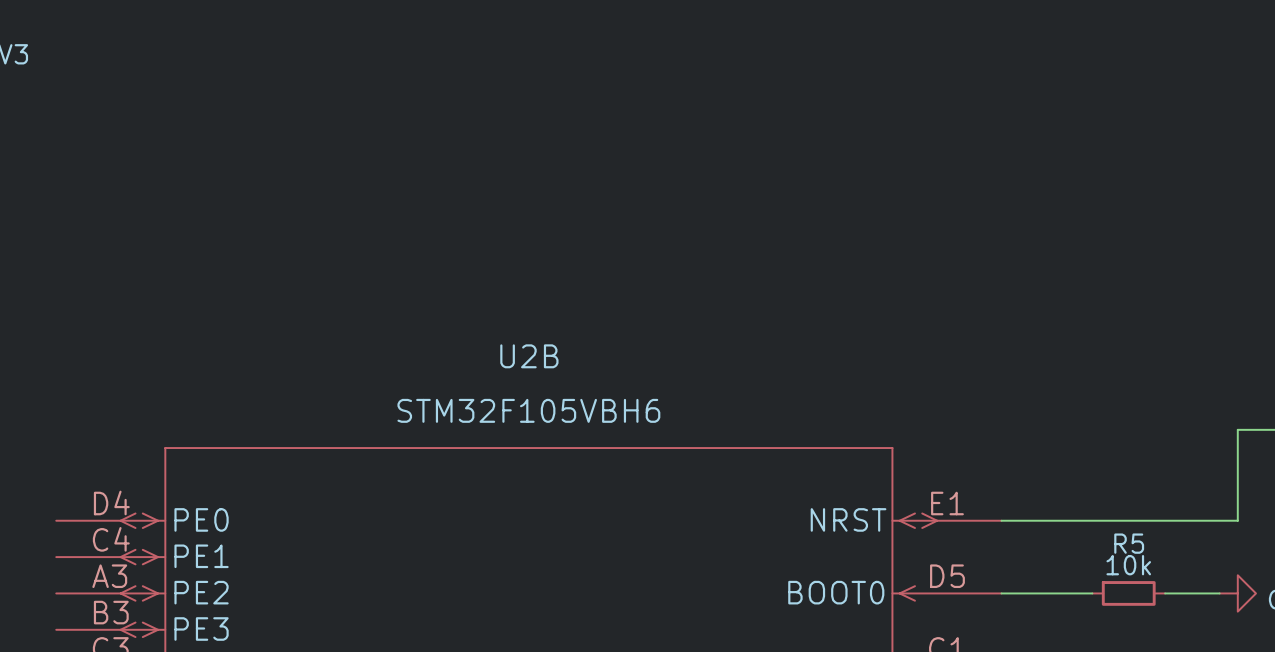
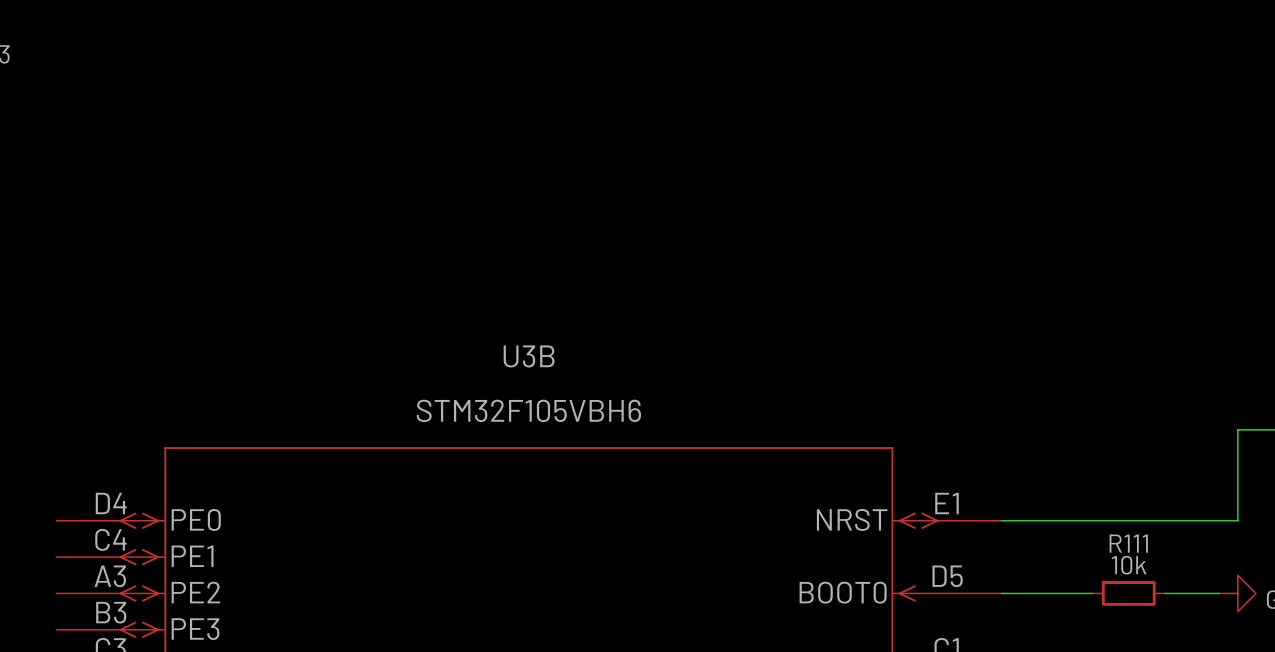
U2B name: U2B (529, 356) -> U3B (529, 356)
R5 name: R5 (1129, 543) -> R111 (1128, 543)

